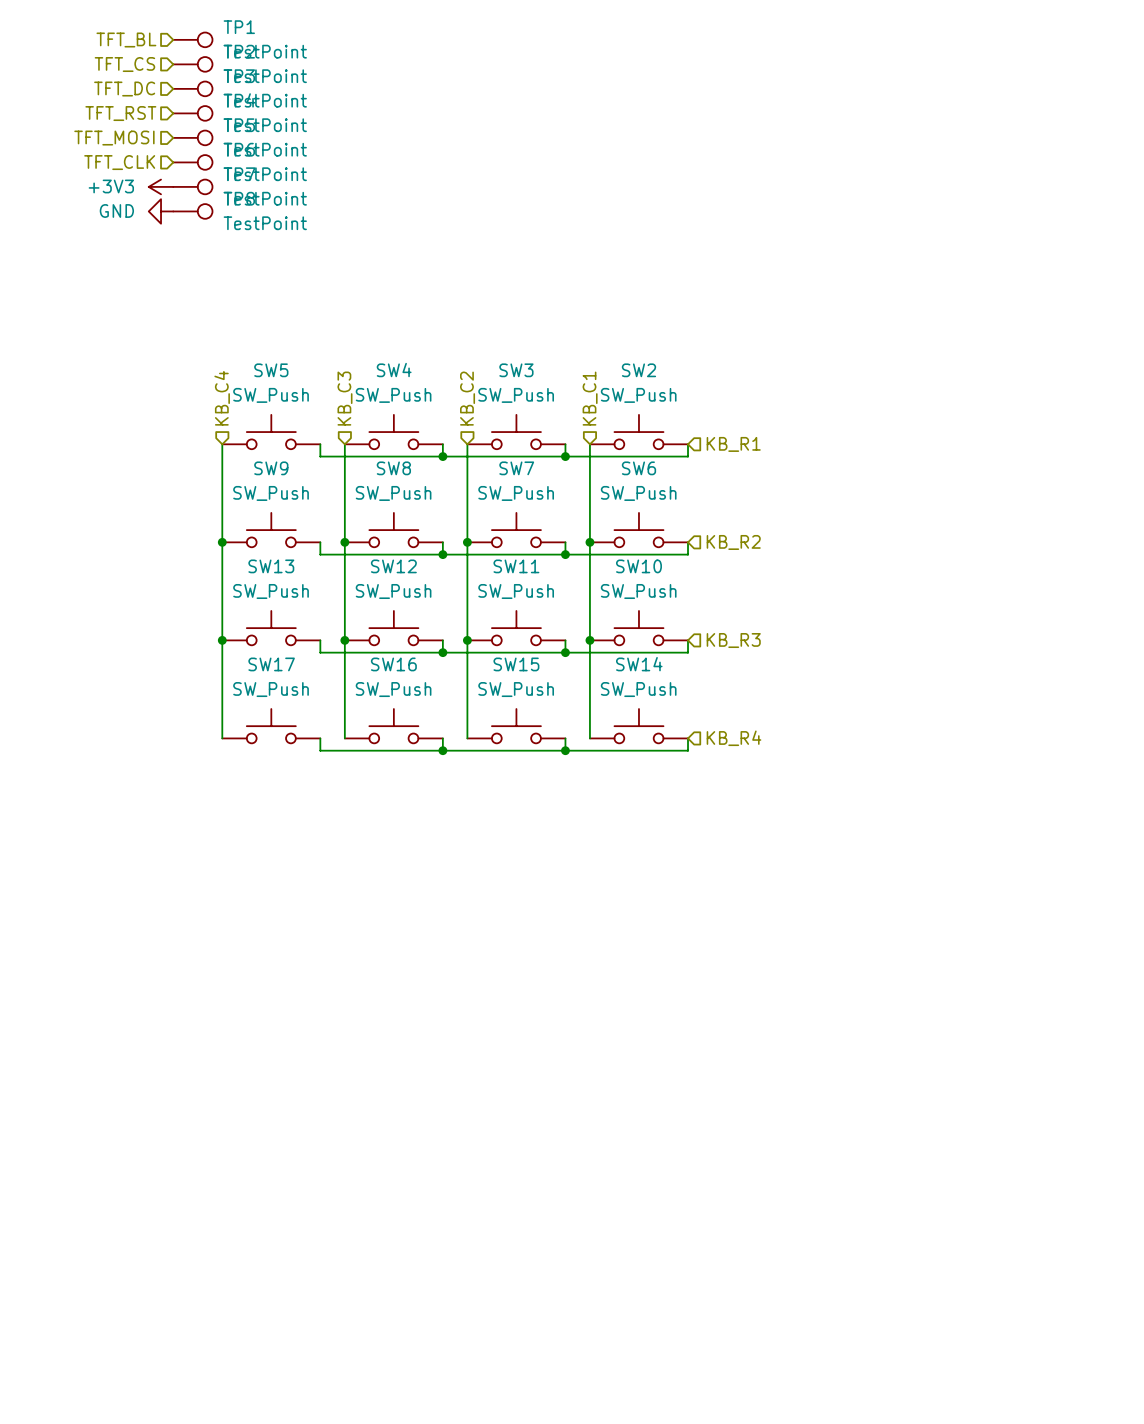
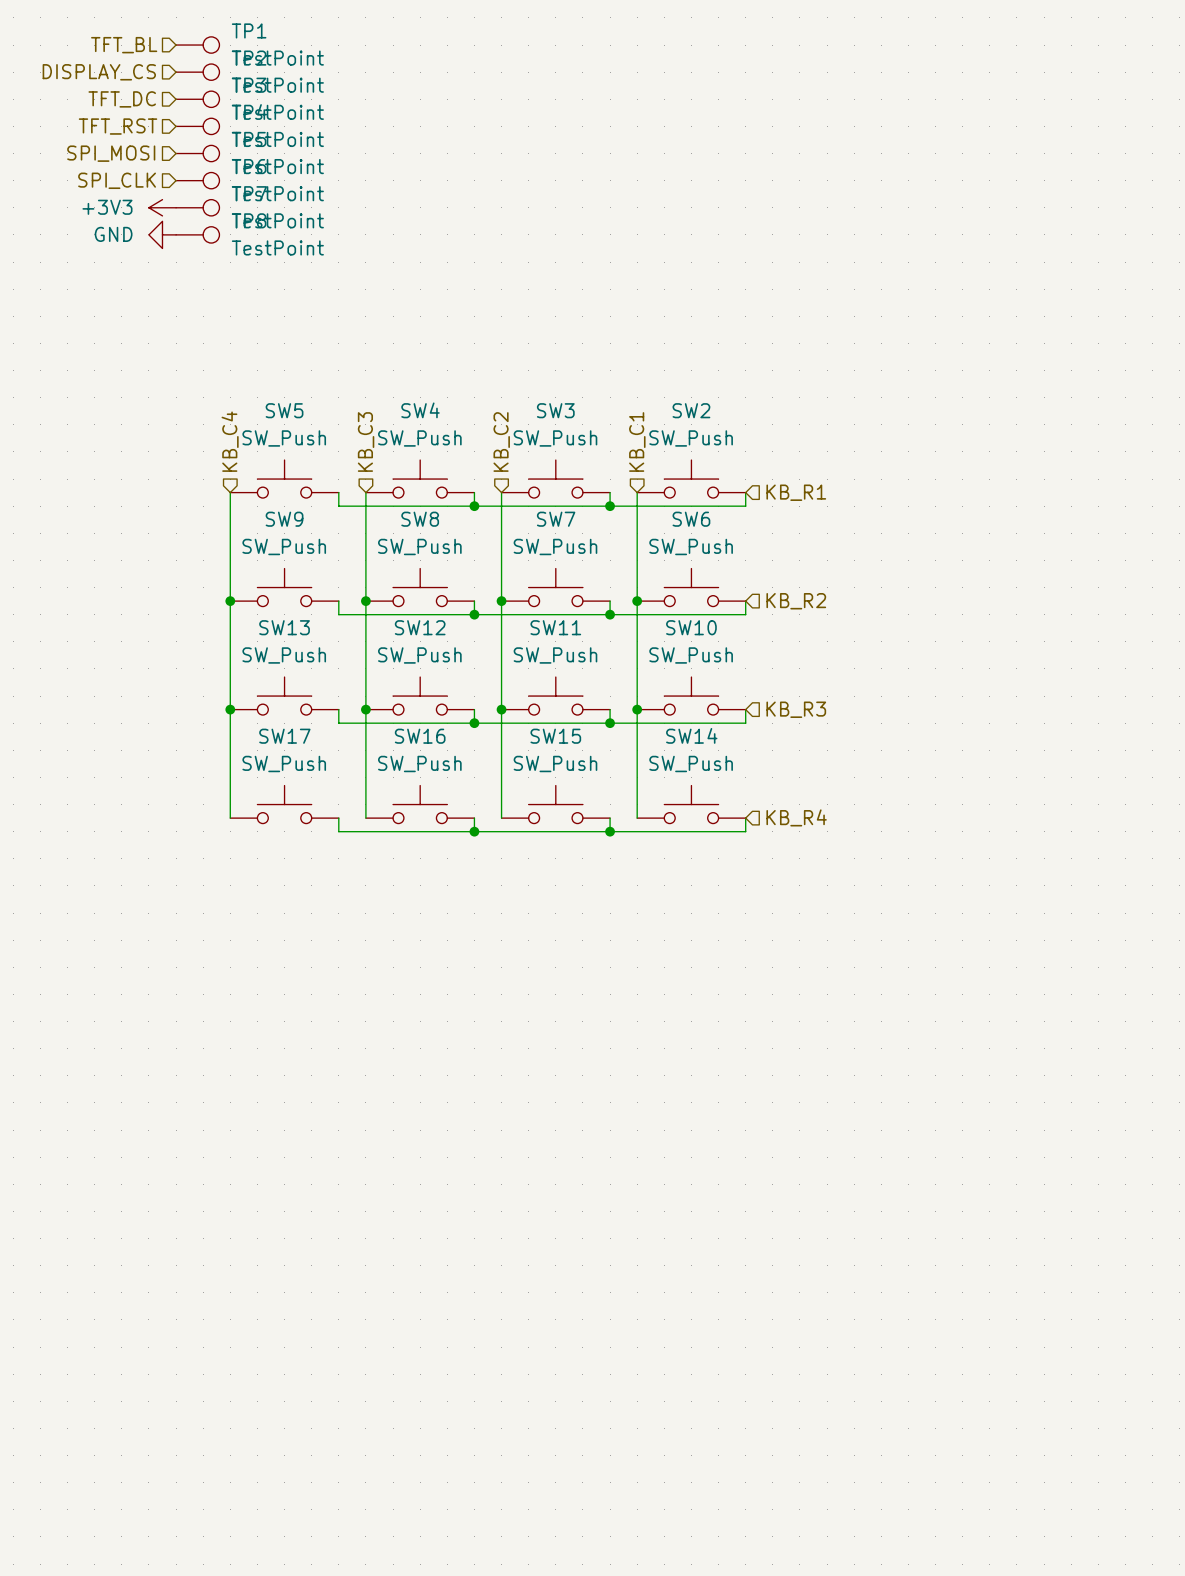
hierarchical label: TFT_CS (124, 64) -> DISPLAY_CS (99, 72)
hierarchical label: TFT_MOSI (114, 138) -> SPI_MOSI (111, 153)
hierarchical label: TFT_CLK (119, 162) -> SPI_CLK (117, 180)

